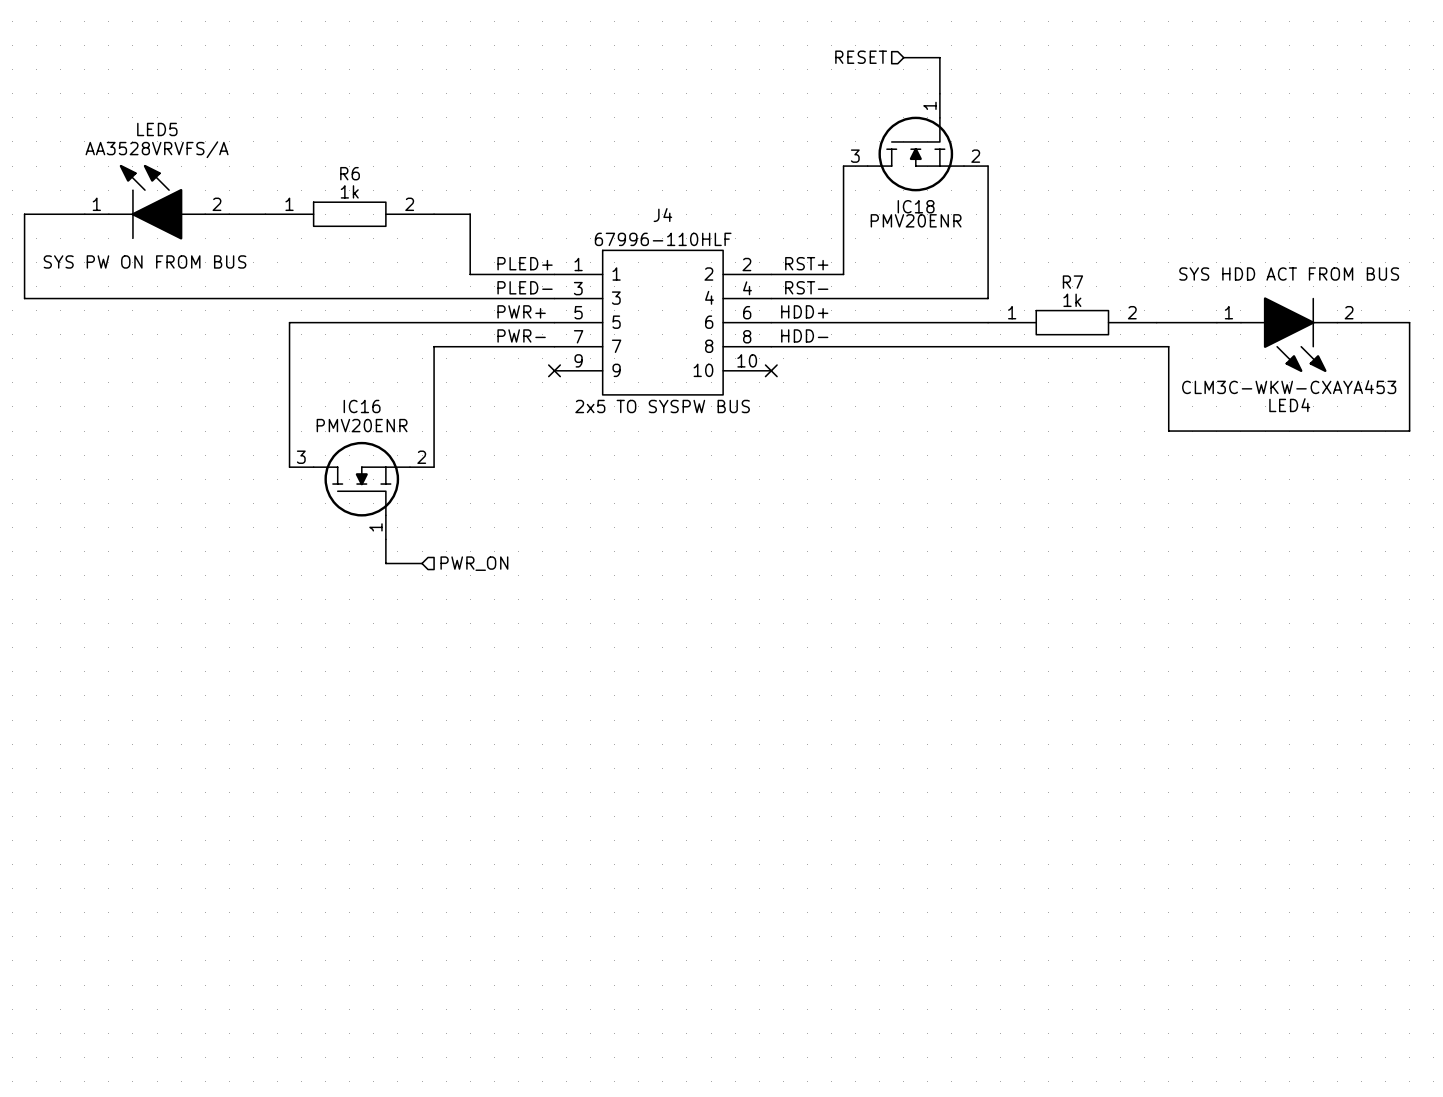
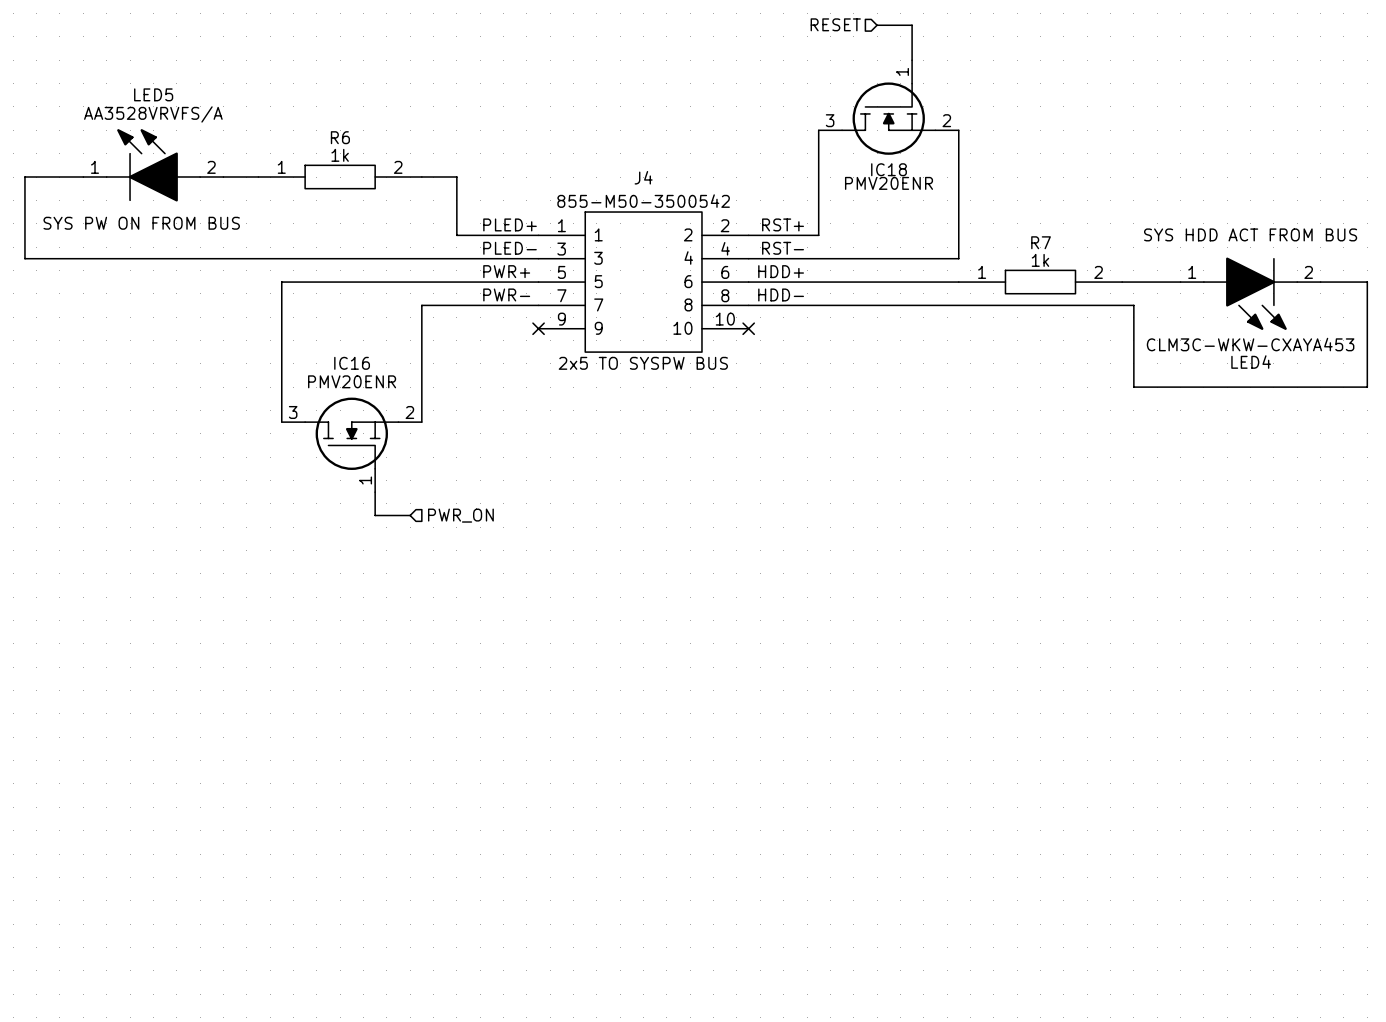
J4 value: 67996-110HLF (663, 239) -> 855-M50-3500542 (643, 201)

